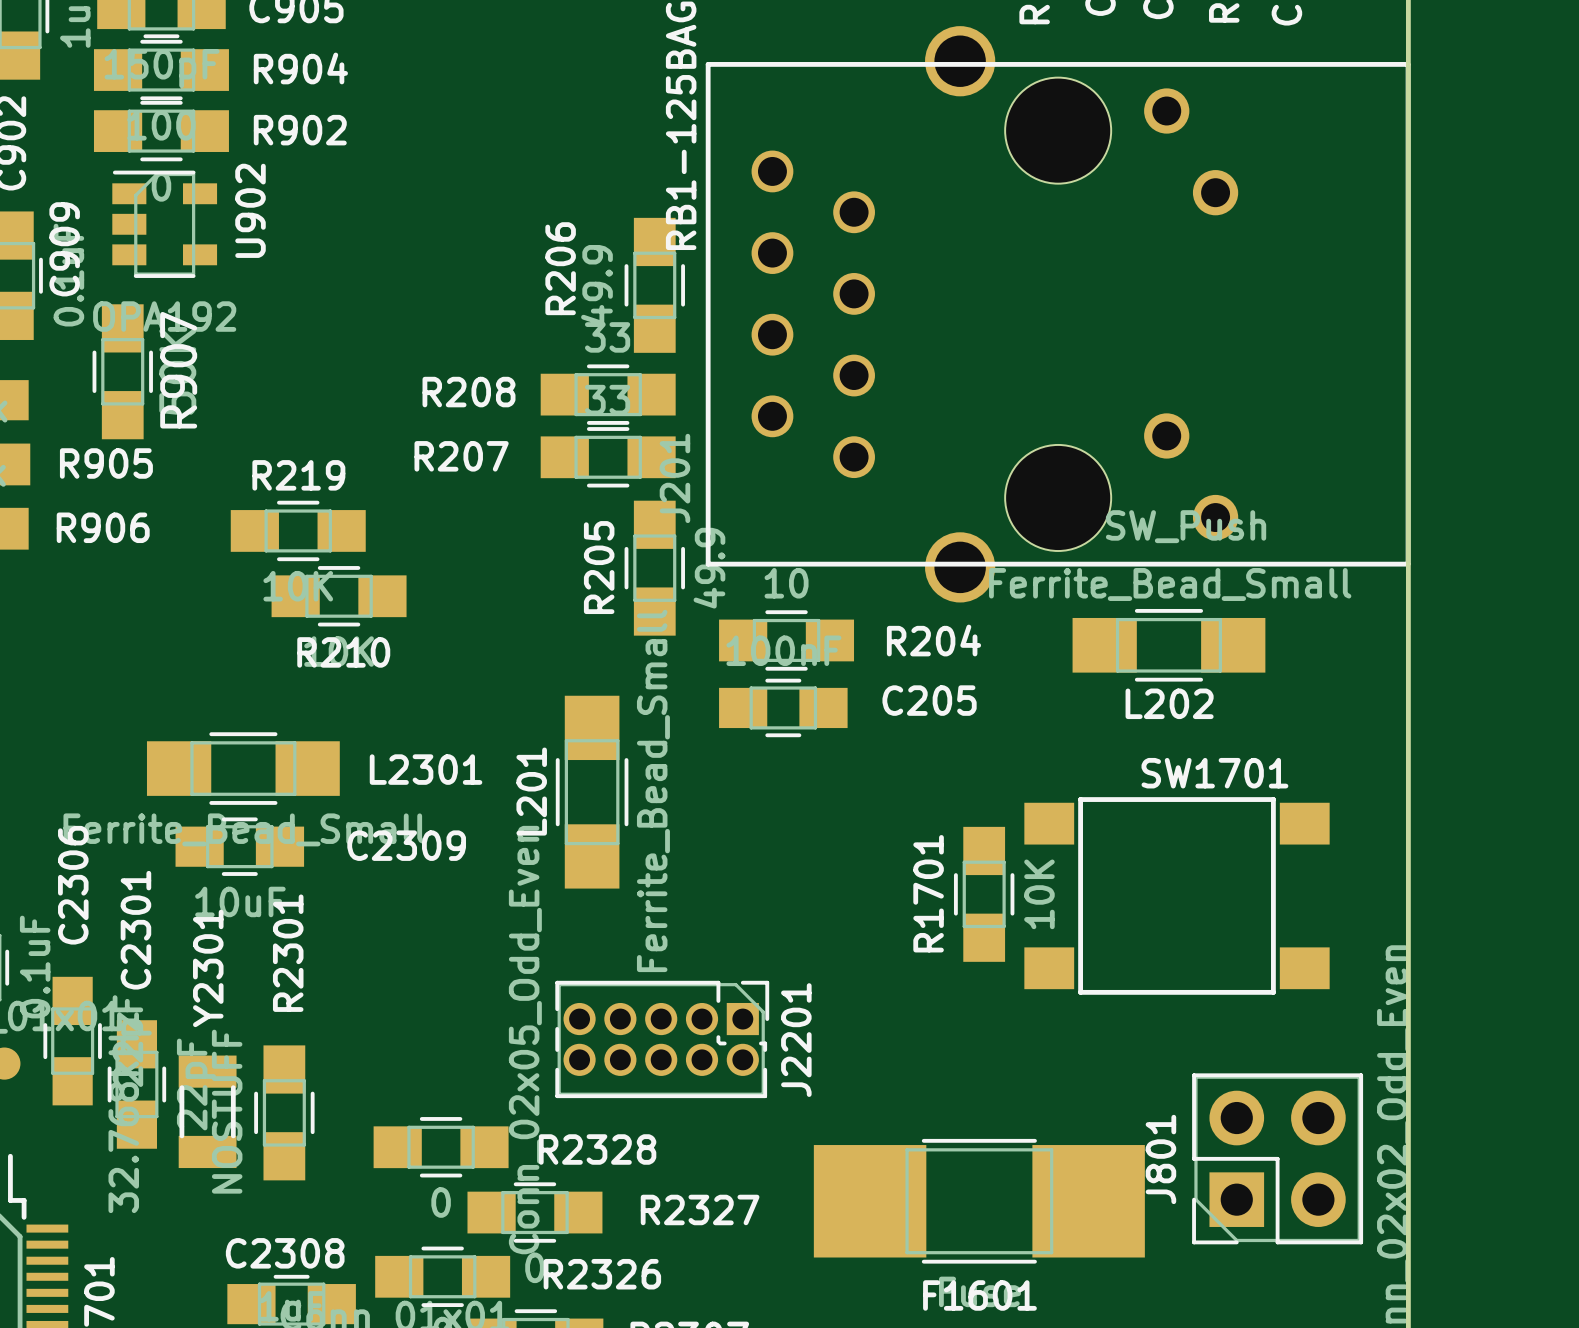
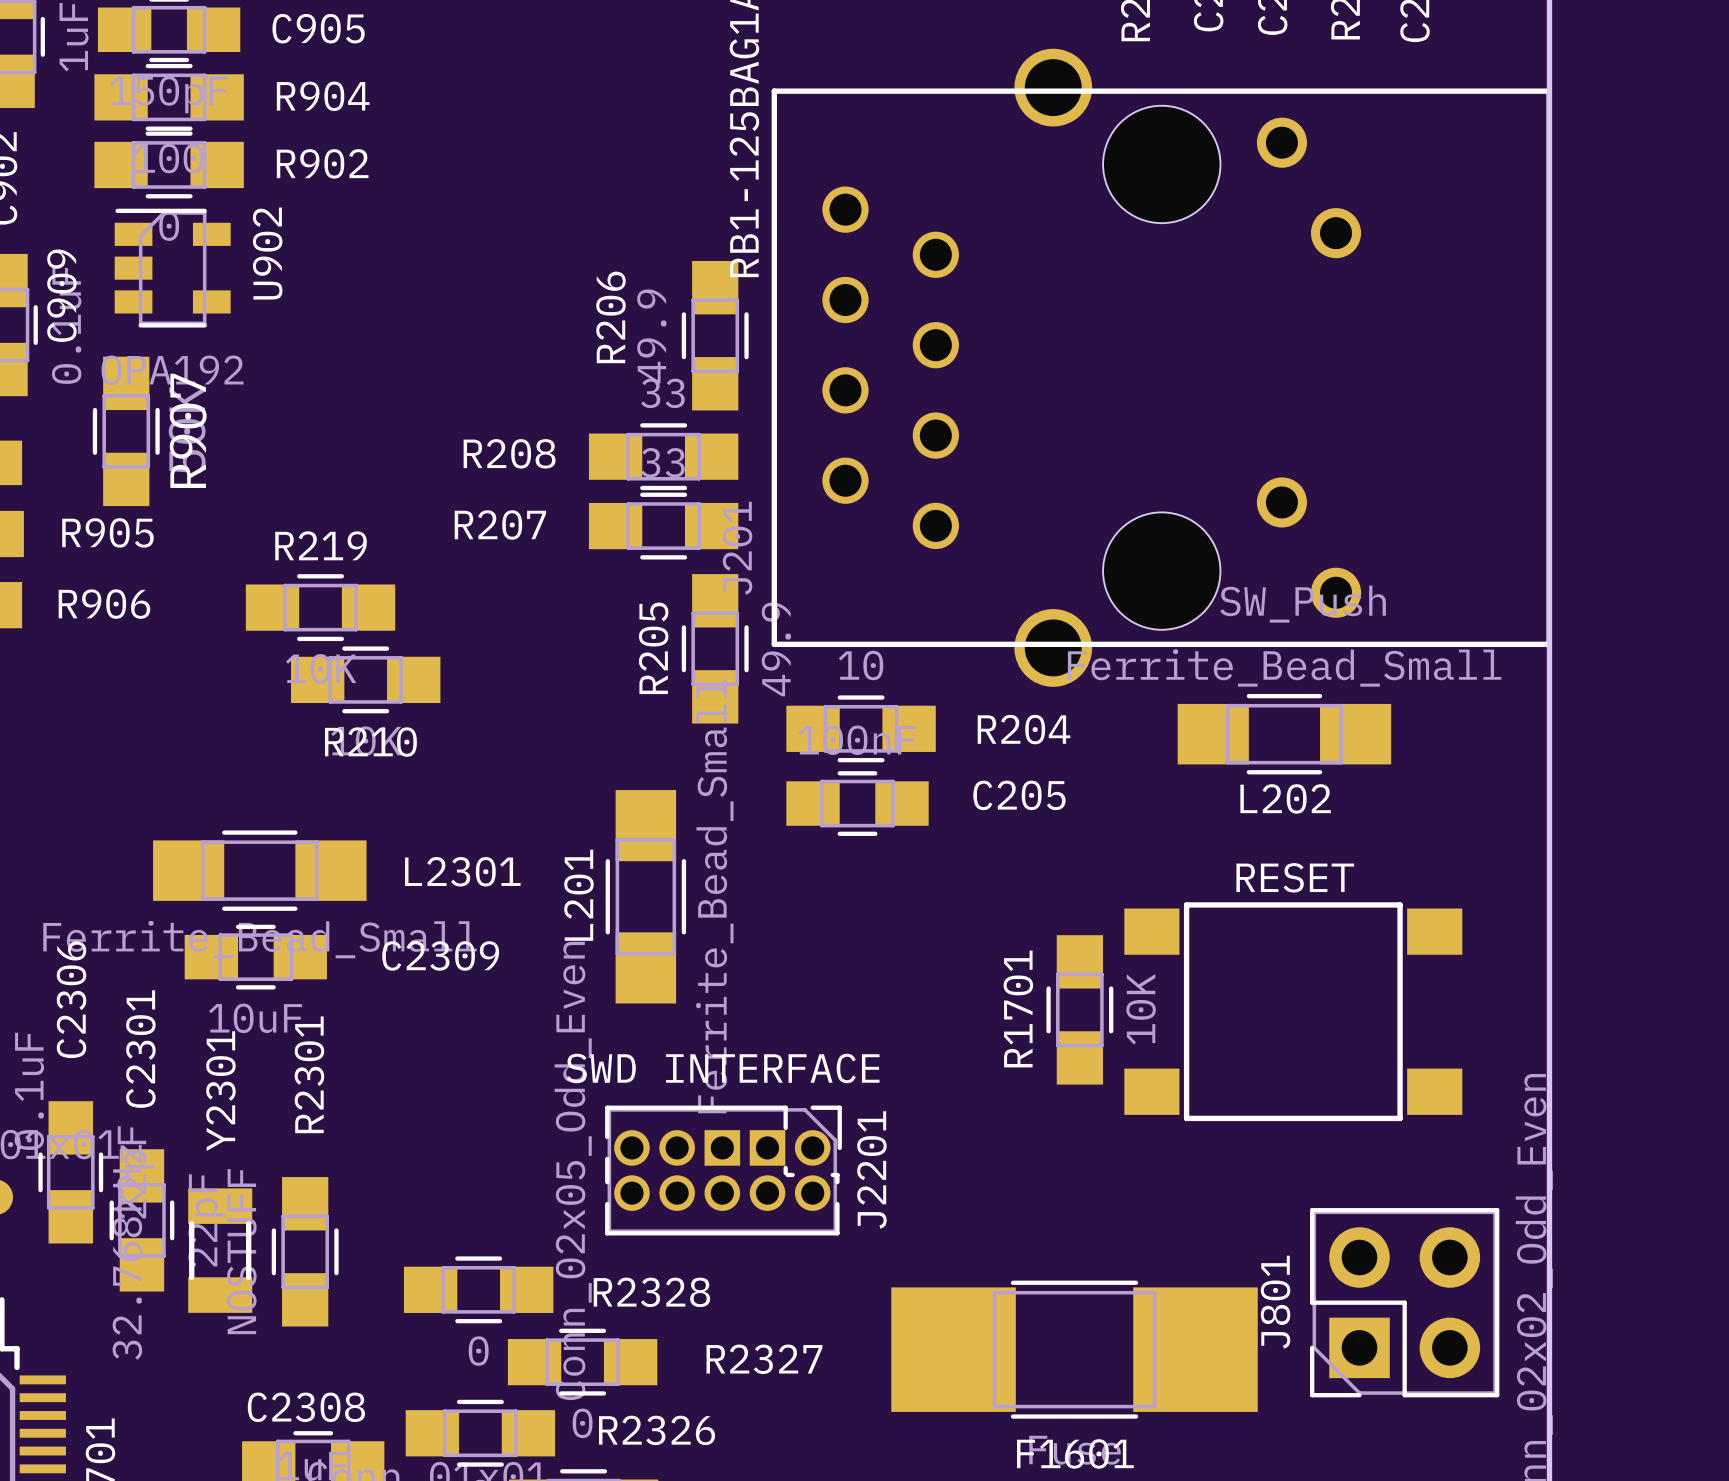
SW1701 name: SW1701 (1214, 773) -> none
text: none -> RESET (1295, 877)
text: none -> SWD INTERFACE (723, 1068)
J2201 footprint: [555, 980, 770, 1099] -> [605, 1105, 842, 1236]

